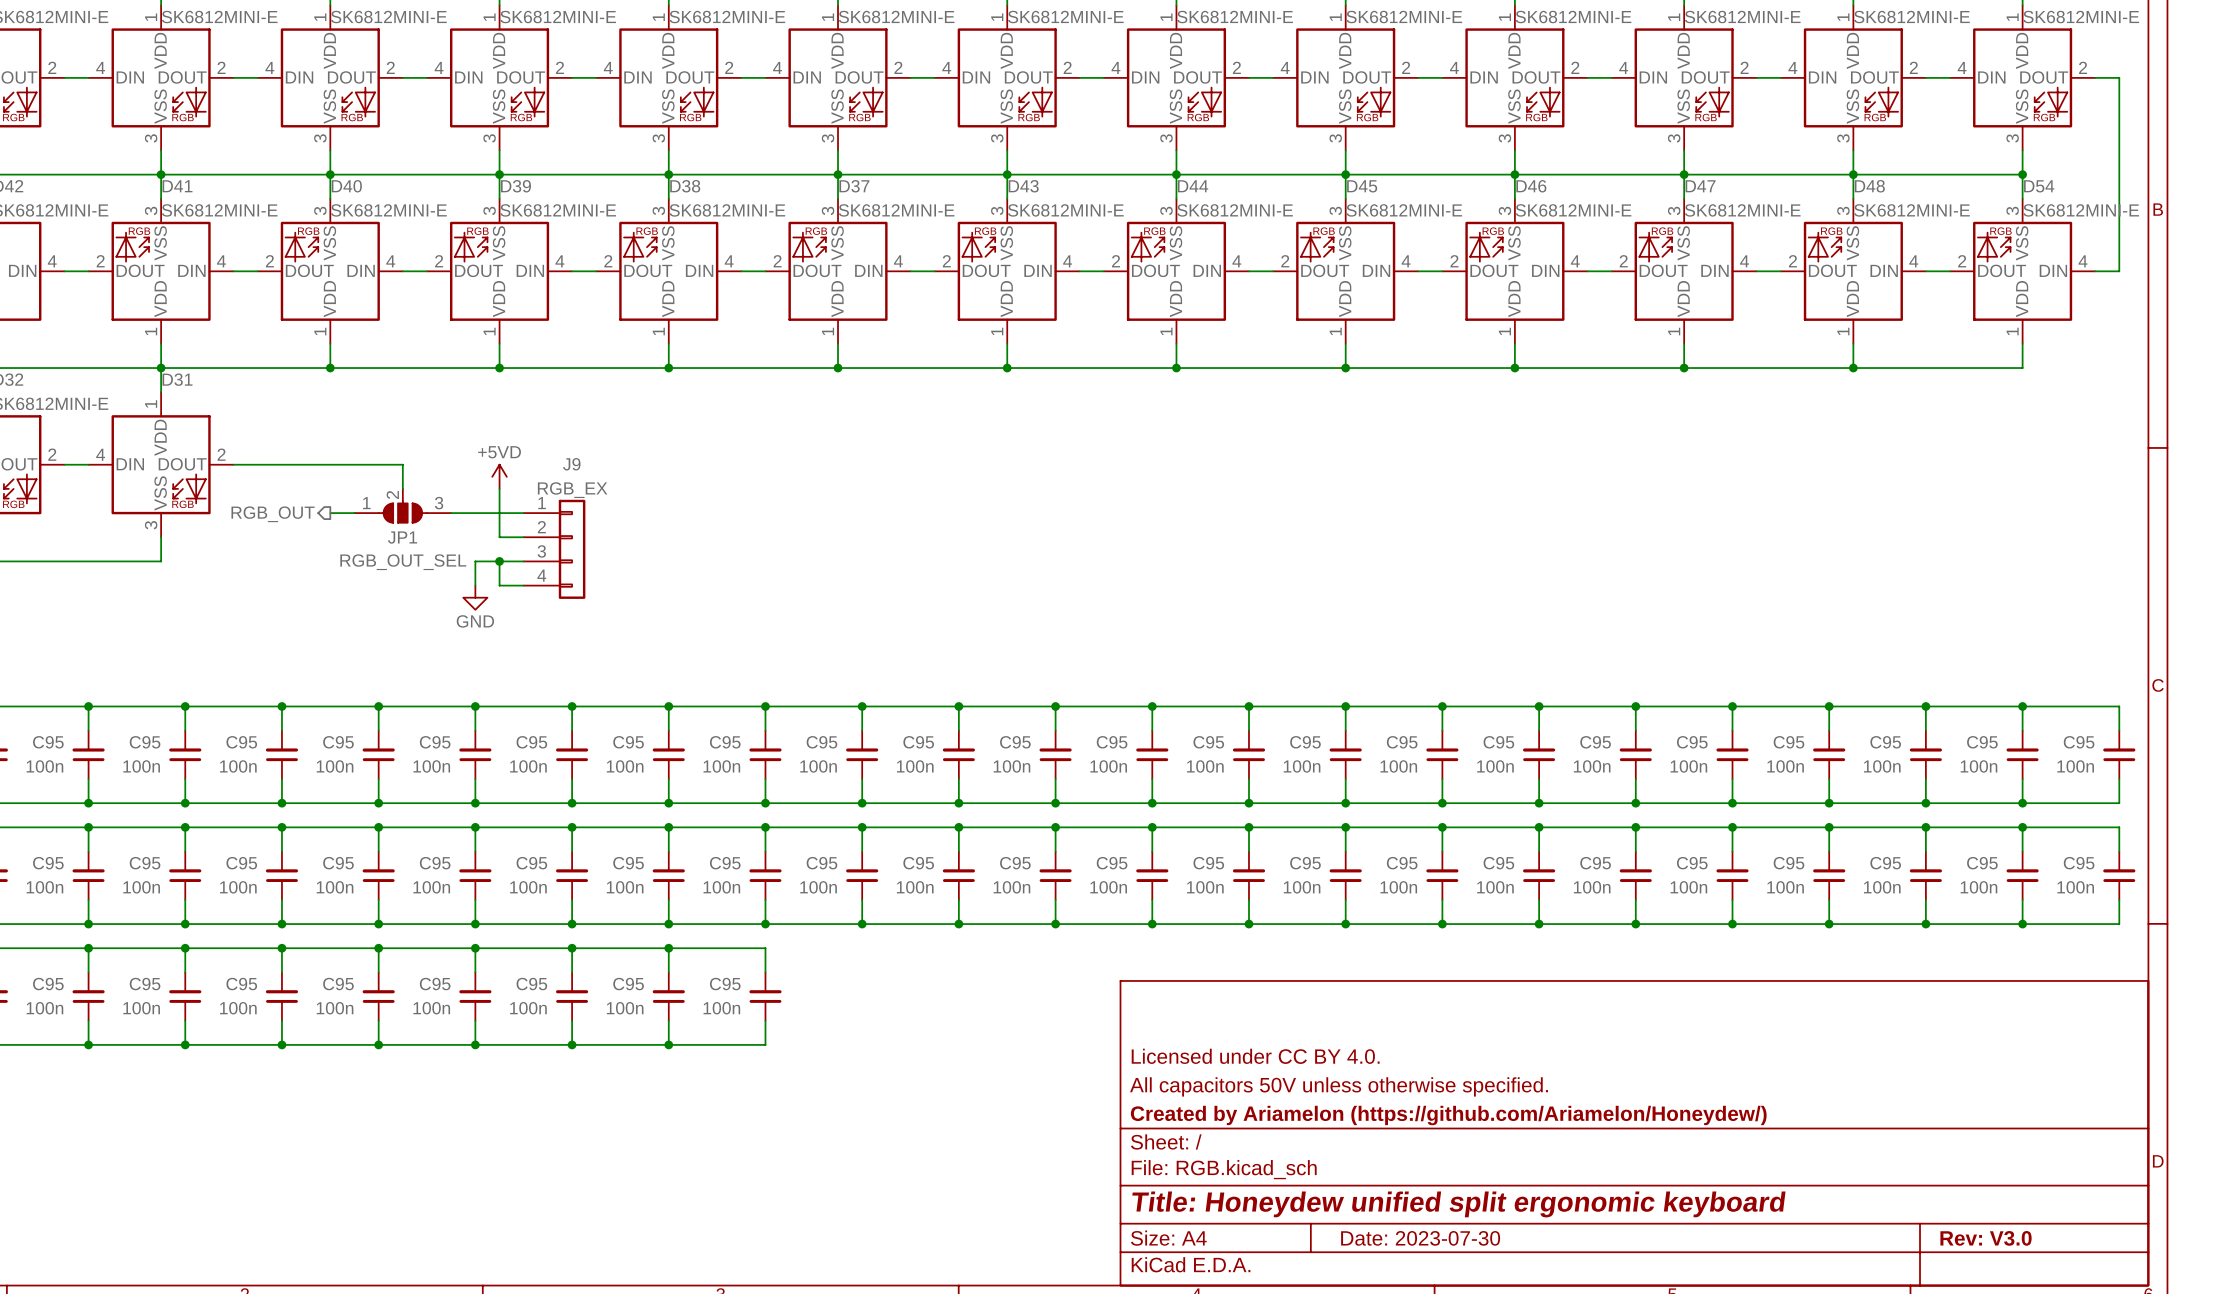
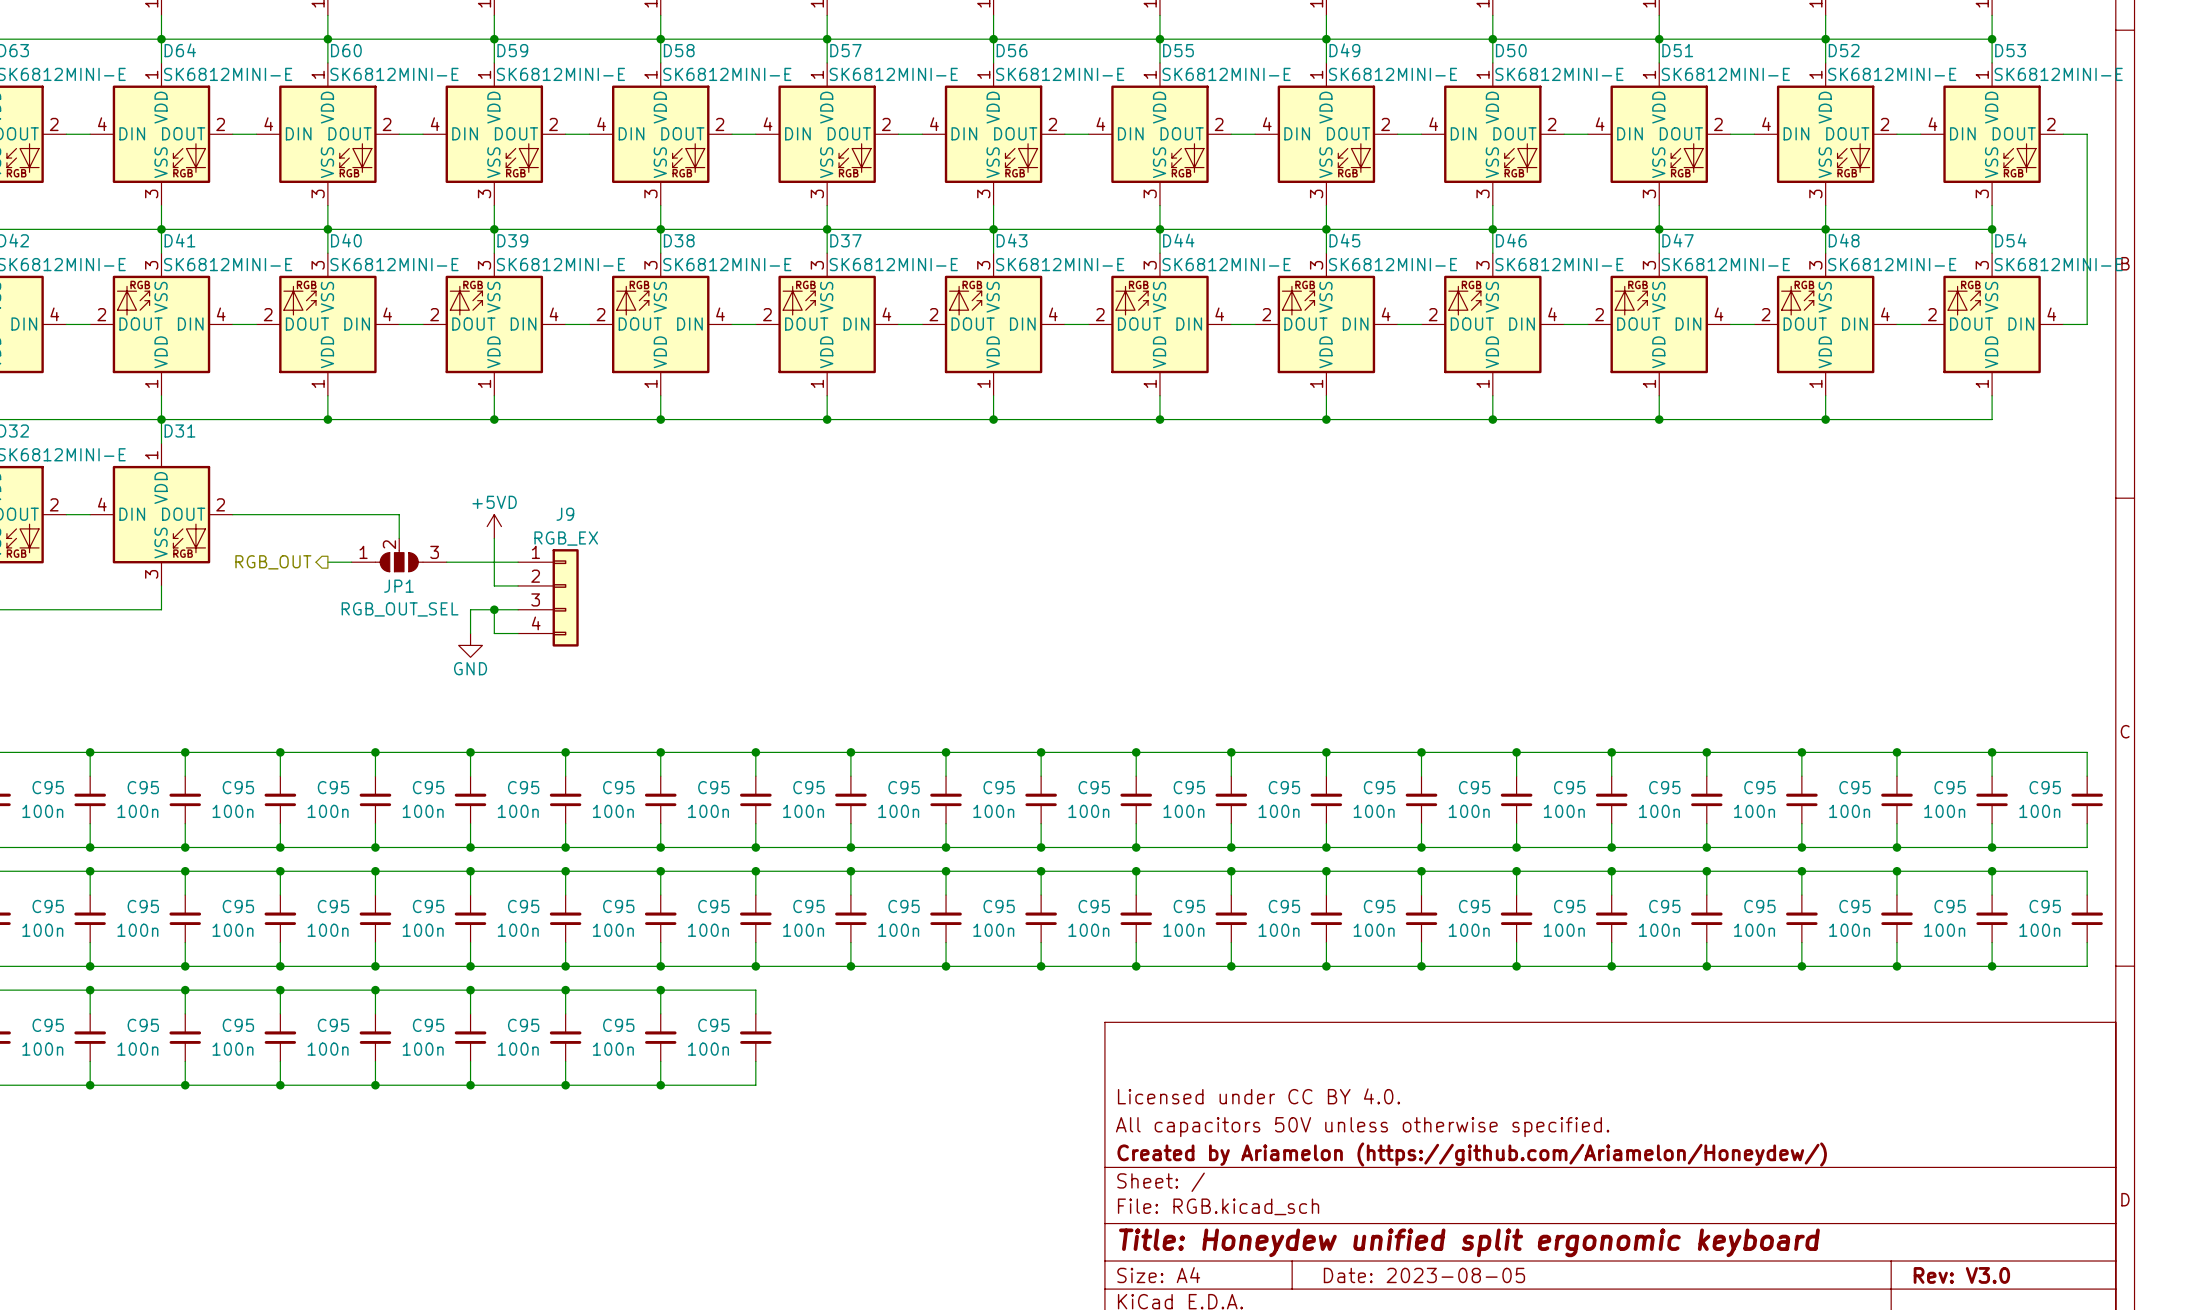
title block: Date: 2023-07-30 (1420, 1238) -> Date: 2023-08-05 (1424, 1275)

